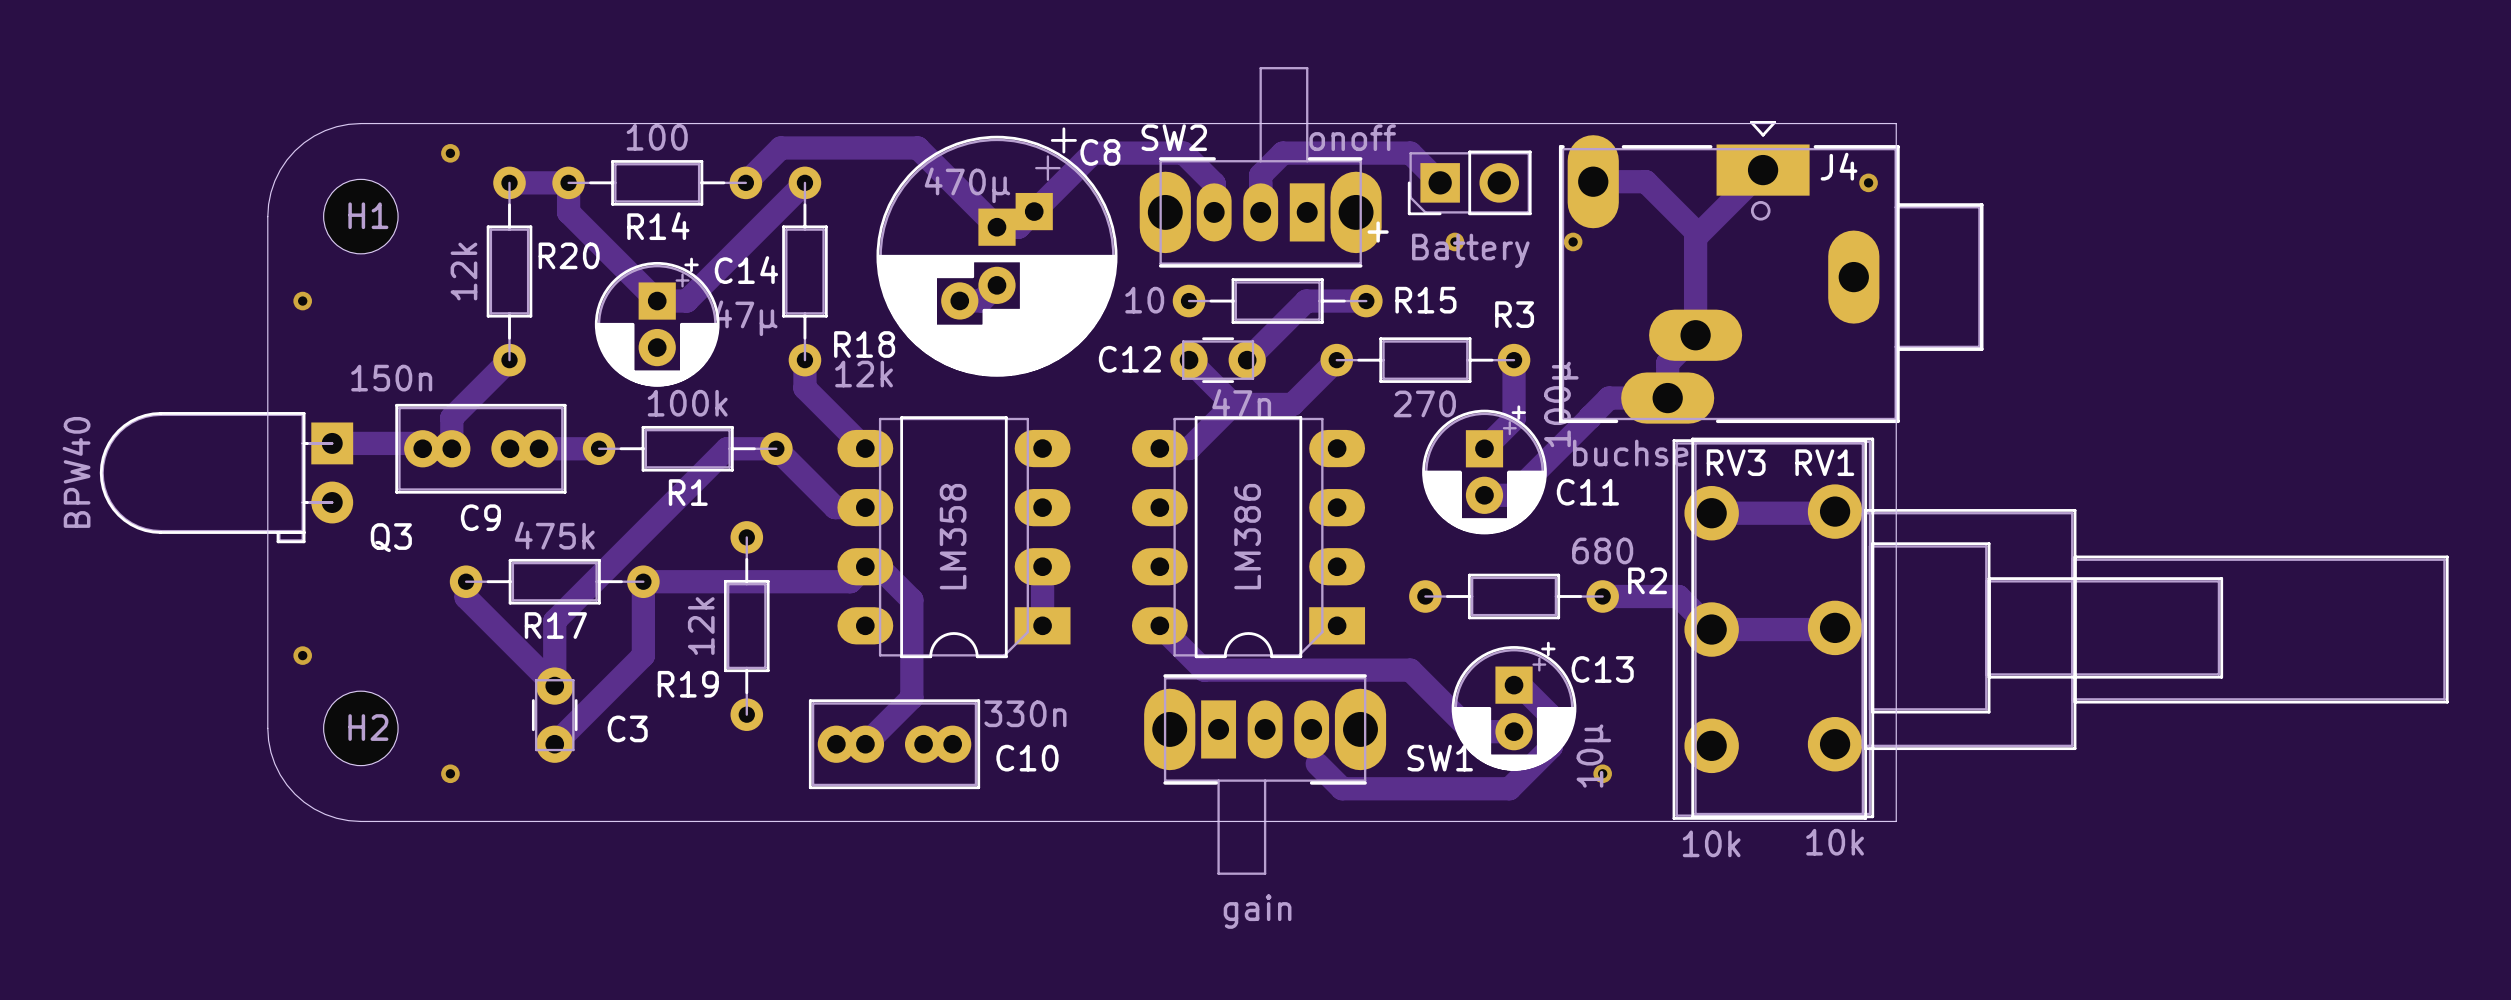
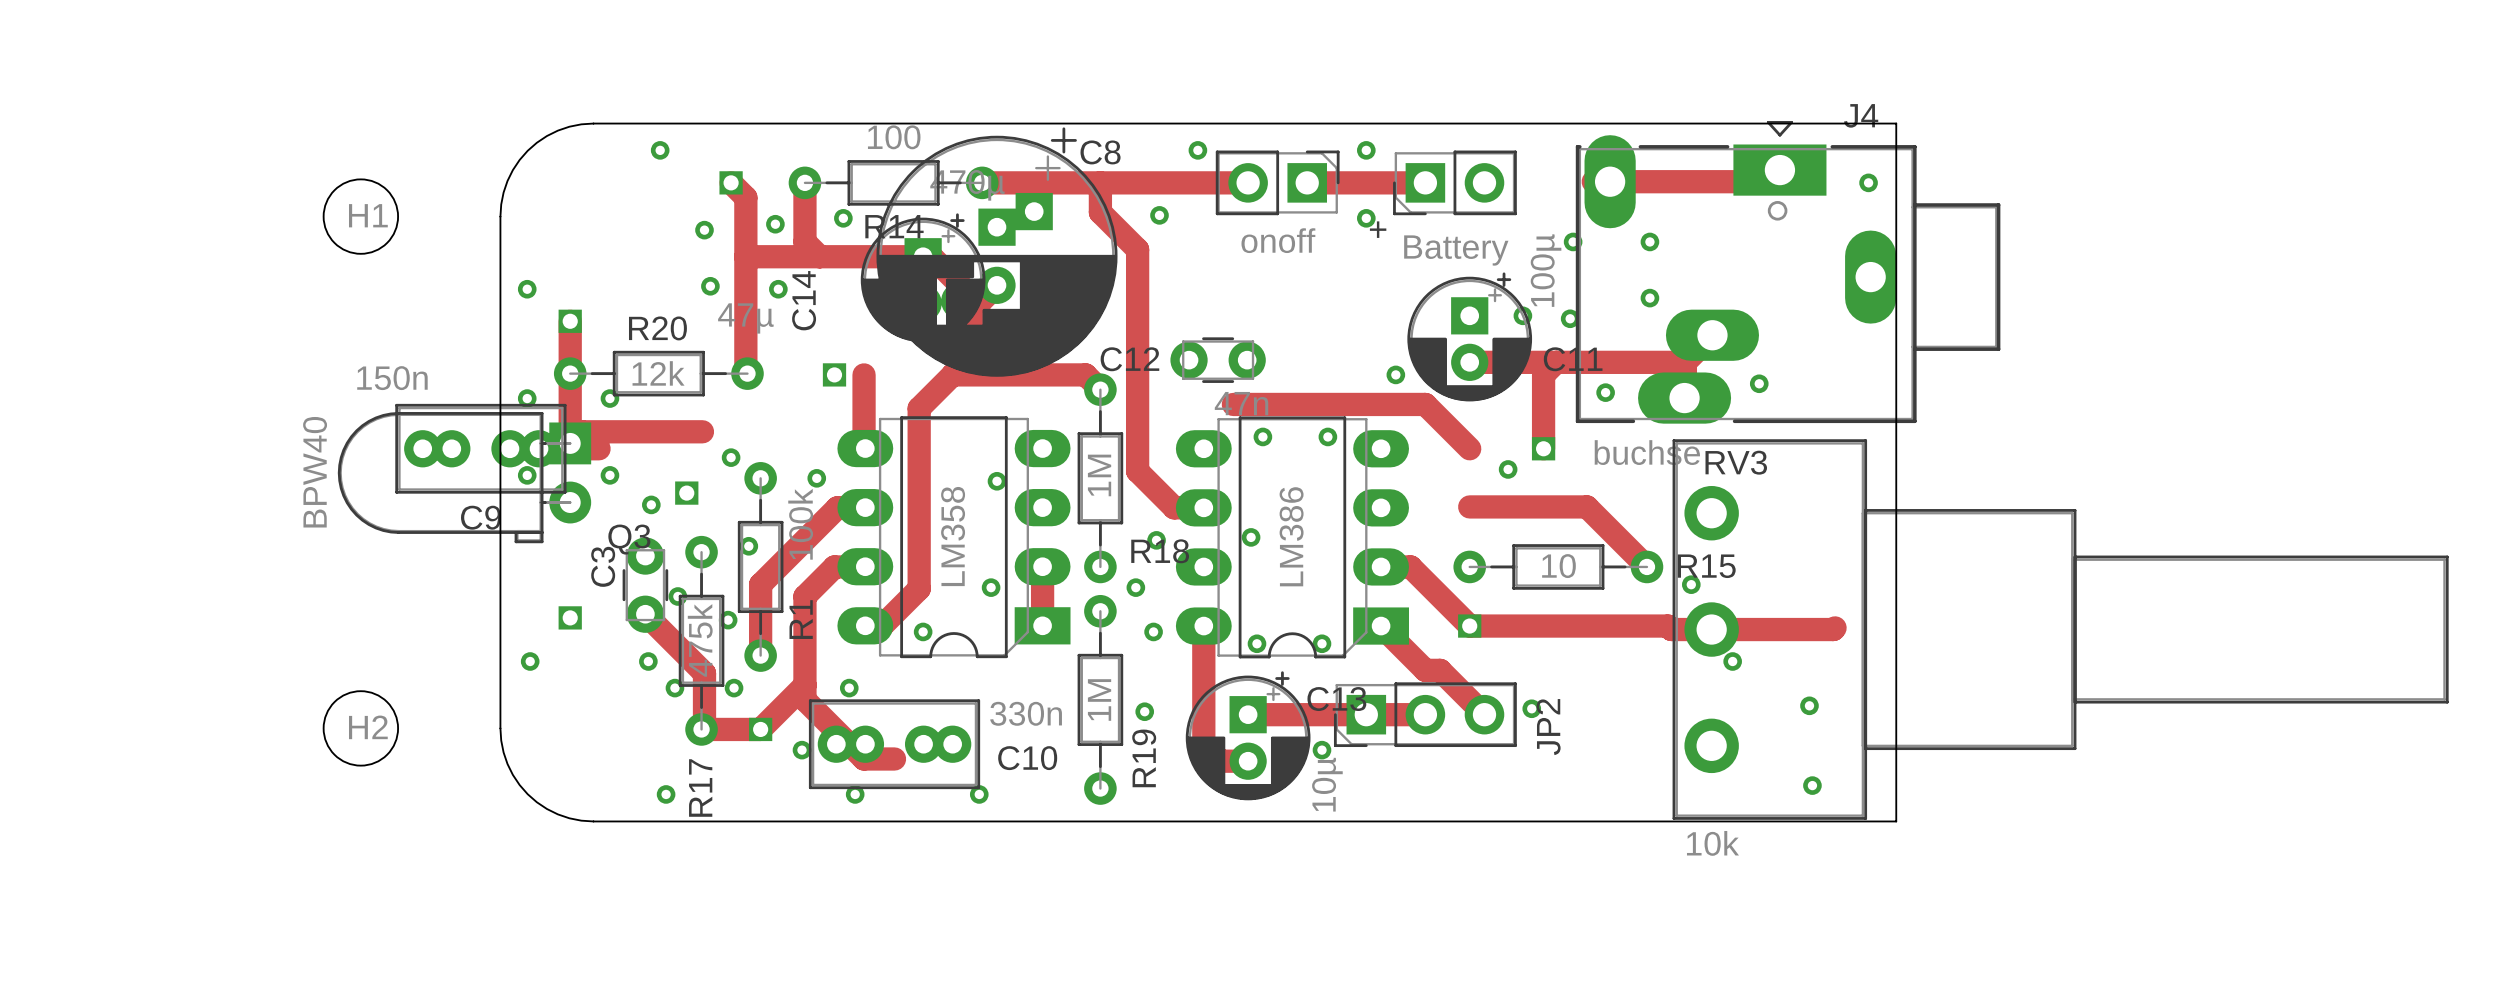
board edge: (593, 123) (360, 123) (336, 126) (314, 136) (295, 150) (287, 159) (280, 170) (270, 192) (267, 216) (267, 728) (270, 752) (280, 774) (295, 794) (314, 808) (336, 818) (348, 820) (593, 821) -> (593, 123) (569, 126) (557, 130) (536, 142) (527, 150) (519, 159) (507, 180) (503, 192) (500, 216) (501, 740) (503, 752) (512, 774) (519, 785) (536, 802) (557, 814) (569, 818) (593, 821)
via: none -> (660, 150)
via: none -> (1197, 150)
via: none -> (1366, 150)
via: (450, 153) -> none
J4 name position: J4 (1839, 166) -> J4 (1861, 115)
SW2: onoff (1260, 167) -> none
track: (1763, 170) (1695, 237) -> none
track: (1645, 181) (1695, 231) (1695, 335) (1667, 363) (1667, 398) (1609, 398) (1512, 495) (1484, 495) -> (1645, 181) (1768, 181) (1779, 170)
track: (509, 182) (568, 182) (568, 212) (657, 301) (686, 301) (804, 182) -> (819, 256) (804, 241) (804, 182)
R14 position: (657, 182) -> (893, 182)
track: none -> (731, 182) (745, 197) (745, 372) (747, 373)
part: none -> (731, 182)
track: (745, 182) (780, 147) (917, 147) (996, 227) (1018, 227) (1092, 153) (1183, 153) (1214, 183) (1214, 212) -> none
track: none -> (982, 182) (1248, 182)
track: none -> (1100, 182) (1100, 212) (1137, 249) (1137, 471) (1174, 507) (1203, 507)
part: none -> onoff (1277, 182)
track: none -> (1307, 182) (1425, 182)
track: (1440, 182) (1410, 153) (1282, 153) (1260, 175) (1260, 216) -> none
part position: (1469, 182) -> (1454, 182)
via: none -> (1159, 215)
via: none -> (843, 218)
via: none -> (1366, 218)
via: none -> (775, 224)
via: none -> (704, 230)
via: (1454, 241) -> none
via: none -> (1649, 241)
R20 name position: R20 (569, 255) -> R20 (657, 328)
track: none -> (745, 256) (931, 256) (971, 296) (971, 356) (919, 408) (919, 588) (881, 626) (864, 626)
C14 name rotation: 0° (746, 270) -> 90° counterclockwise (804, 300)
R20 rotation: 0° (509, 271) -> 90° clockwise (658, 373)
R20 position: (509, 271) -> (658, 373)
R18 position: (804, 271) -> (1100, 478)
J4 position: (1771, 272) -> (1788, 272)
via: none -> (710, 286)
via: none -> (527, 289)
via: none -> (778, 289)
via: none -> (1649, 298)
R15 value position: 10 (1144, 300) -> 10 (1558, 566)
via: (302, 301) -> none
R15 position: (1277, 301) -> (1558, 566)
track: (1366, 301) (1306, 301) (1247, 360) -> none
via: none -> (1522, 315)
via: none -> (1570, 318)
track: none -> (570, 321) (570, 443) (581, 431) (702, 431)
part: none -> (570, 321)
C14 position: (657, 322) -> (923, 277)
track: (509, 360) (451, 417) (451, 448) (422, 448) (417, 443) (332, 443) -> none
track: (804, 360) (804, 388) (865, 448) -> none
track: (1189, 360) (1233, 404) (1189, 448) (1159, 448) -> none
track: (1336, 360) (1292, 404) -> (1469, 448) (1425, 404) (1292, 404)
R3: 270 (1425, 360) -> none
track: (1514, 360) (1514, 419) (1484, 448) -> none
track: none -> (1469, 362) (1685, 362)
track: none -> (1556, 362) (1543, 374) (1543, 448)
part: none -> (834, 374)
track: none -> (864, 374) (864, 448)
R18 value: 12k (864, 374) -> 1M (1099, 475)
track: none -> (952, 374) (1085, 374) (1100, 389)
via: none -> (1395, 374)
via: none -> (1759, 383)
via: none -> (1605, 392)
via: none -> (527, 398)
via: none -> (609, 398)
via: none -> (1262, 436)
via: none -> (1327, 436)
R1 rotation: 0° (687, 448) -> 90° clockwise (760, 566)
R1 position: (687, 448) -> (760, 566)
part: none -> (1543, 448)
via: none -> (731, 457)
C11 position: (1484, 469) -> (1469, 336)
via: none -> (1508, 469)
via: none -> (527, 475)
via: none -> (609, 475)
Q3 position: (226, 477) -> (464, 477)
via: none -> (816, 478)
via: none -> (996, 481)
part: none -> (686, 493)
via: none -> (651, 504)
track: none -> (1469, 506) (1586, 506) (1646, 566)
track: none -> (864, 507) (837, 507) (760, 584) (760, 655)
track: (865, 507) (835, 507) (776, 448) (727, 448) (554, 621) (554, 686) (466, 597) (466, 581) -> none
track: (1835, 511) (1833, 513) (1711, 513) -> none
part position: (1248, 537) -> (1292, 537)
via: none -> (1251, 537)
via: none -> (1156, 540)
via: none -> (748, 546)
track: none -> (864, 566) (834, 566) (804, 596) (804, 699) (864, 758) (894, 758)
R17 rotation: 0° (554, 581) -> 90° clockwise (701, 640)
R17 position: (554, 581) -> (701, 640)
via: none -> (1691, 584)
via: none -> (991, 587)
via: none -> (1135, 587)
via: none -> (677, 596)
R2: 680 (1514, 596) -> none
track: (1602, 596) (1678, 596) (1711, 629) -> (1381, 566) (1410, 566) (1469, 626) (1667, 626) (1671, 629) (1711, 629)
track: none -> (645, 614) (704, 673) (704, 726) (701, 729) (760, 729) (804, 685)
part: none -> (570, 617)
via: none -> (728, 620)
R17 name position: R17 (555, 625) -> R17 (700, 788)
track: (1159, 625) (1204, 670) (1410, 670) (1471, 731) (1514, 731) -> none
R19 value: 12k (701, 626) -> 1M (1099, 700)
R19 position: (746, 626) -> (1100, 699)
track: none -> (1203, 626) (1203, 744) (1220, 761) (1248, 761)
track: none -> (1381, 626) (1425, 670) (1440, 670) (1484, 714)
part: none -> (1469, 626)
RV1: 10k (1957, 627) -> none
via: none -> (923, 631)
via: none -> (1153, 631)
via: none -> (1256, 643)
via: none -> (1321, 643)
via: (302, 655) -> none
via: none -> (530, 661)
via: none -> (648, 661)
via: none -> (1732, 661)
R19 name rotation: 0° (688, 684) -> 90° counterclockwise (1144, 758)
R19 name position: R19 (688, 684) -> R19 (1144, 758)
track: (1514, 685) (1520, 685) (1551, 716) (1551, 747) (1509, 788) (1342, 788) (1317, 763) -> none
via: none -> (674, 688)
via: none -> (734, 688)
via: none -> (849, 688)
via: none -> (1809, 705)
C13 position: (1514, 706) -> (1248, 735)
via: none -> (1531, 708)
via: none -> (1144, 711)
track: none -> (1248, 714) (1425, 714)
JP2: none -> (1425, 714)
C3 position: (554, 715) -> (645, 585)
C3 name rotation: 0° (627, 728) -> 90° counterclockwise (603, 566)
C3 name position: C3 (627, 728) -> C3 (603, 566)
part: none -> (760, 729)
track: (554, 744) (643, 655) (643, 581) (850, 581) (865, 566) (878, 566) (911, 599) (911, 697) (865, 744) (836, 744) -> none
via: none -> (802, 750)
via: none -> (1321, 750)
via: (450, 773) -> none
via: (1602, 773) -> none
SW1: gain (1265, 774) -> none
via: none -> (1812, 785)
via: none -> (666, 794)
via: none -> (855, 794)
via: none -> (979, 794)

